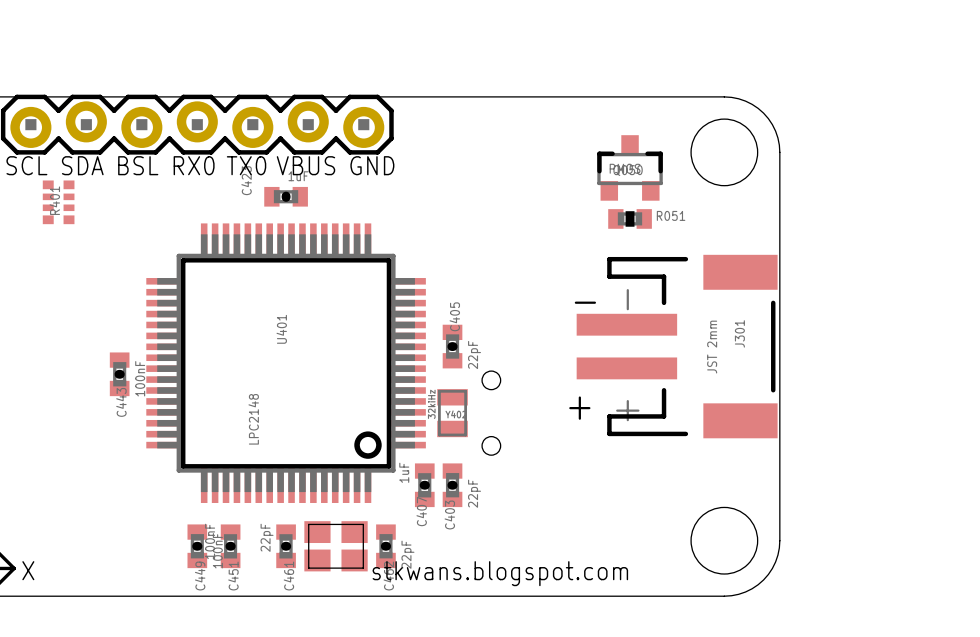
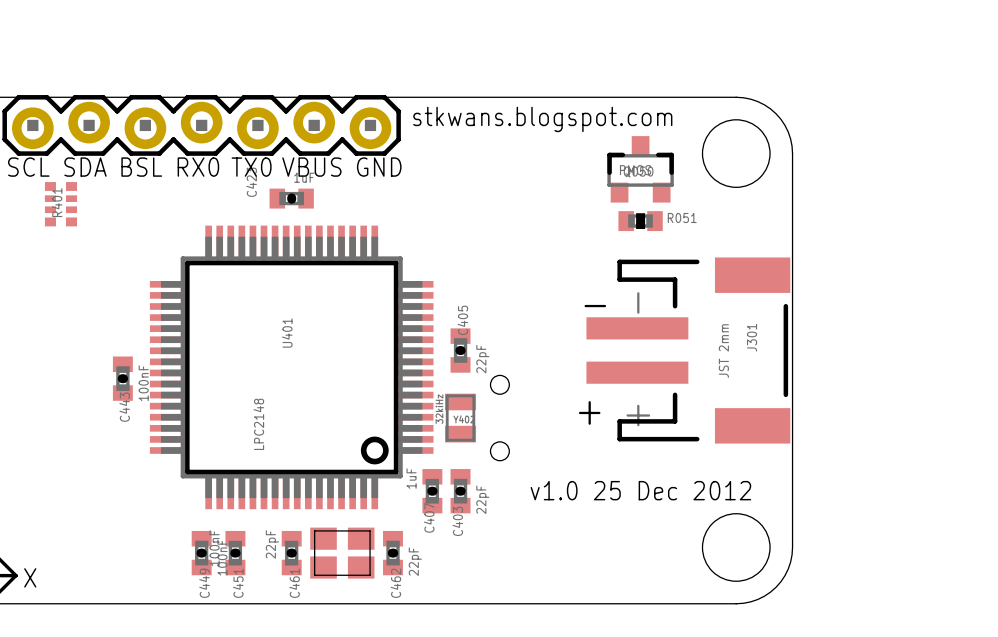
text: none -> v1.0 25 Dec 2012 (640, 490)
text position: stkwans.blogspot.com (500, 573) -> stkwans.blogspot.com (542, 119)

